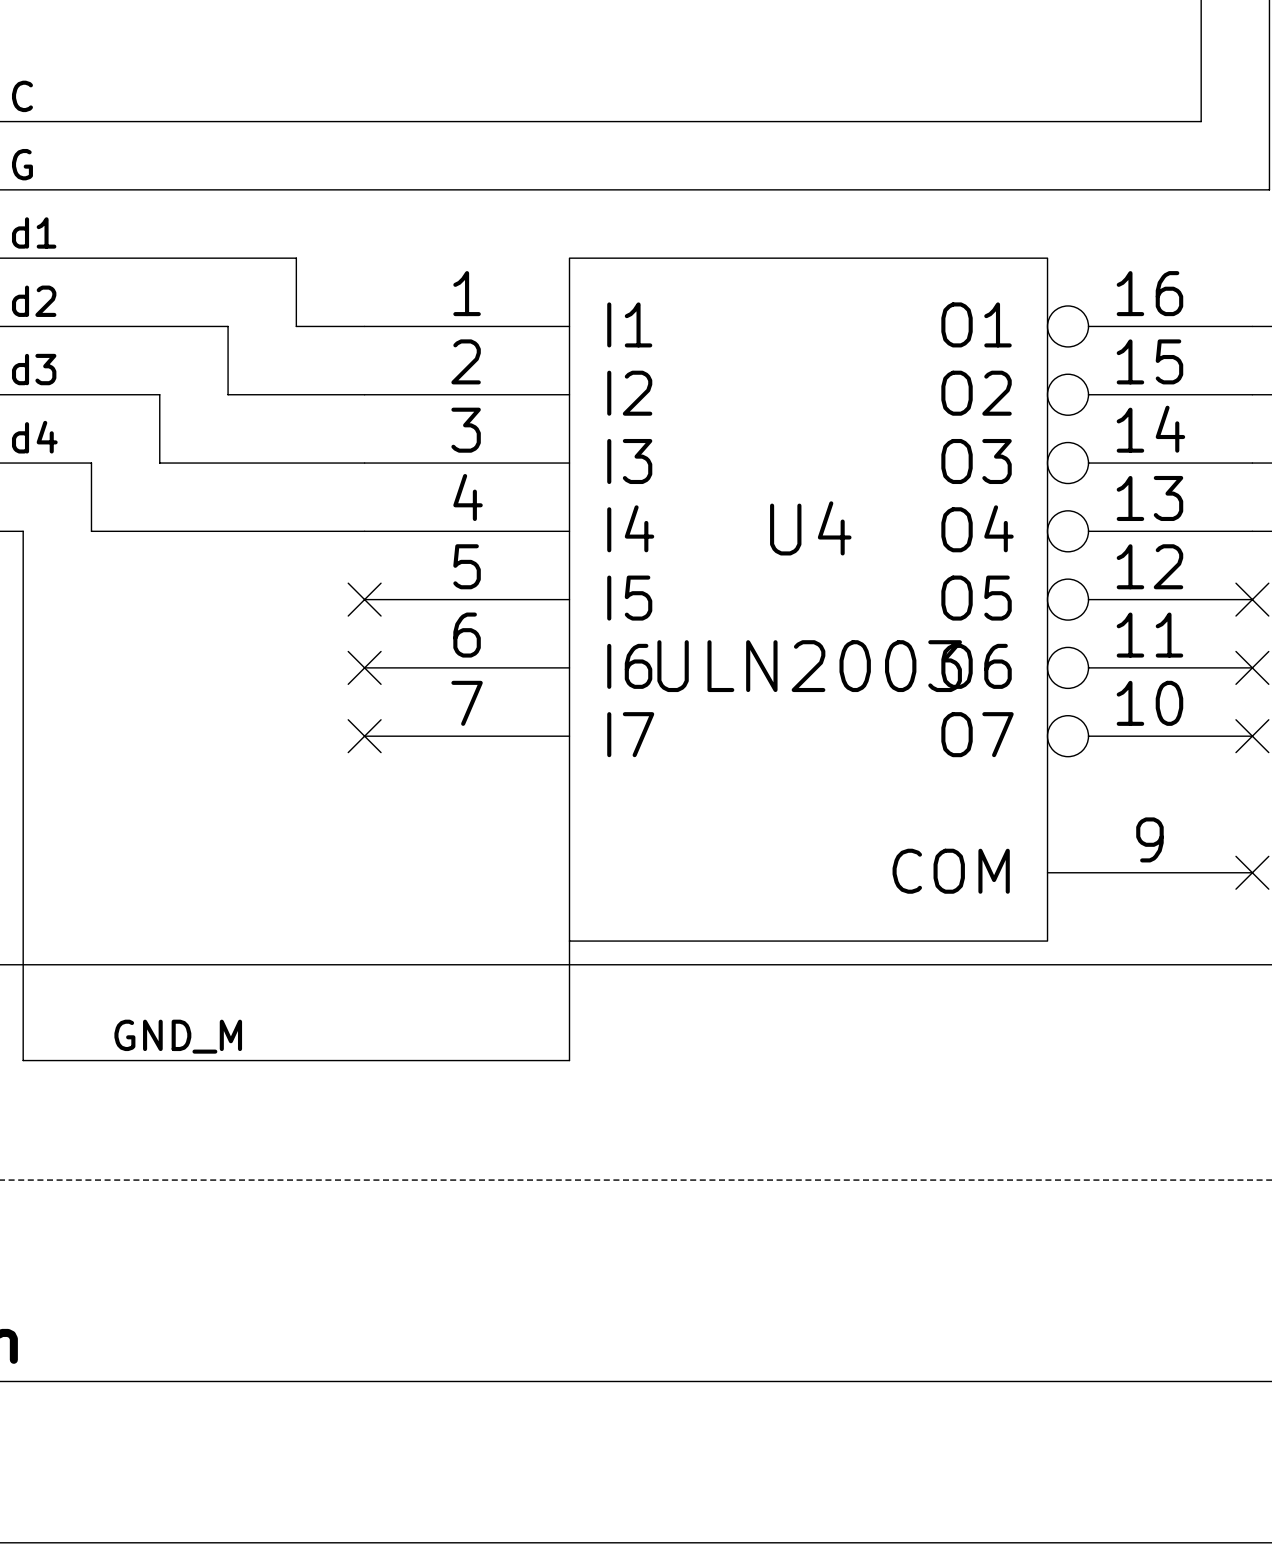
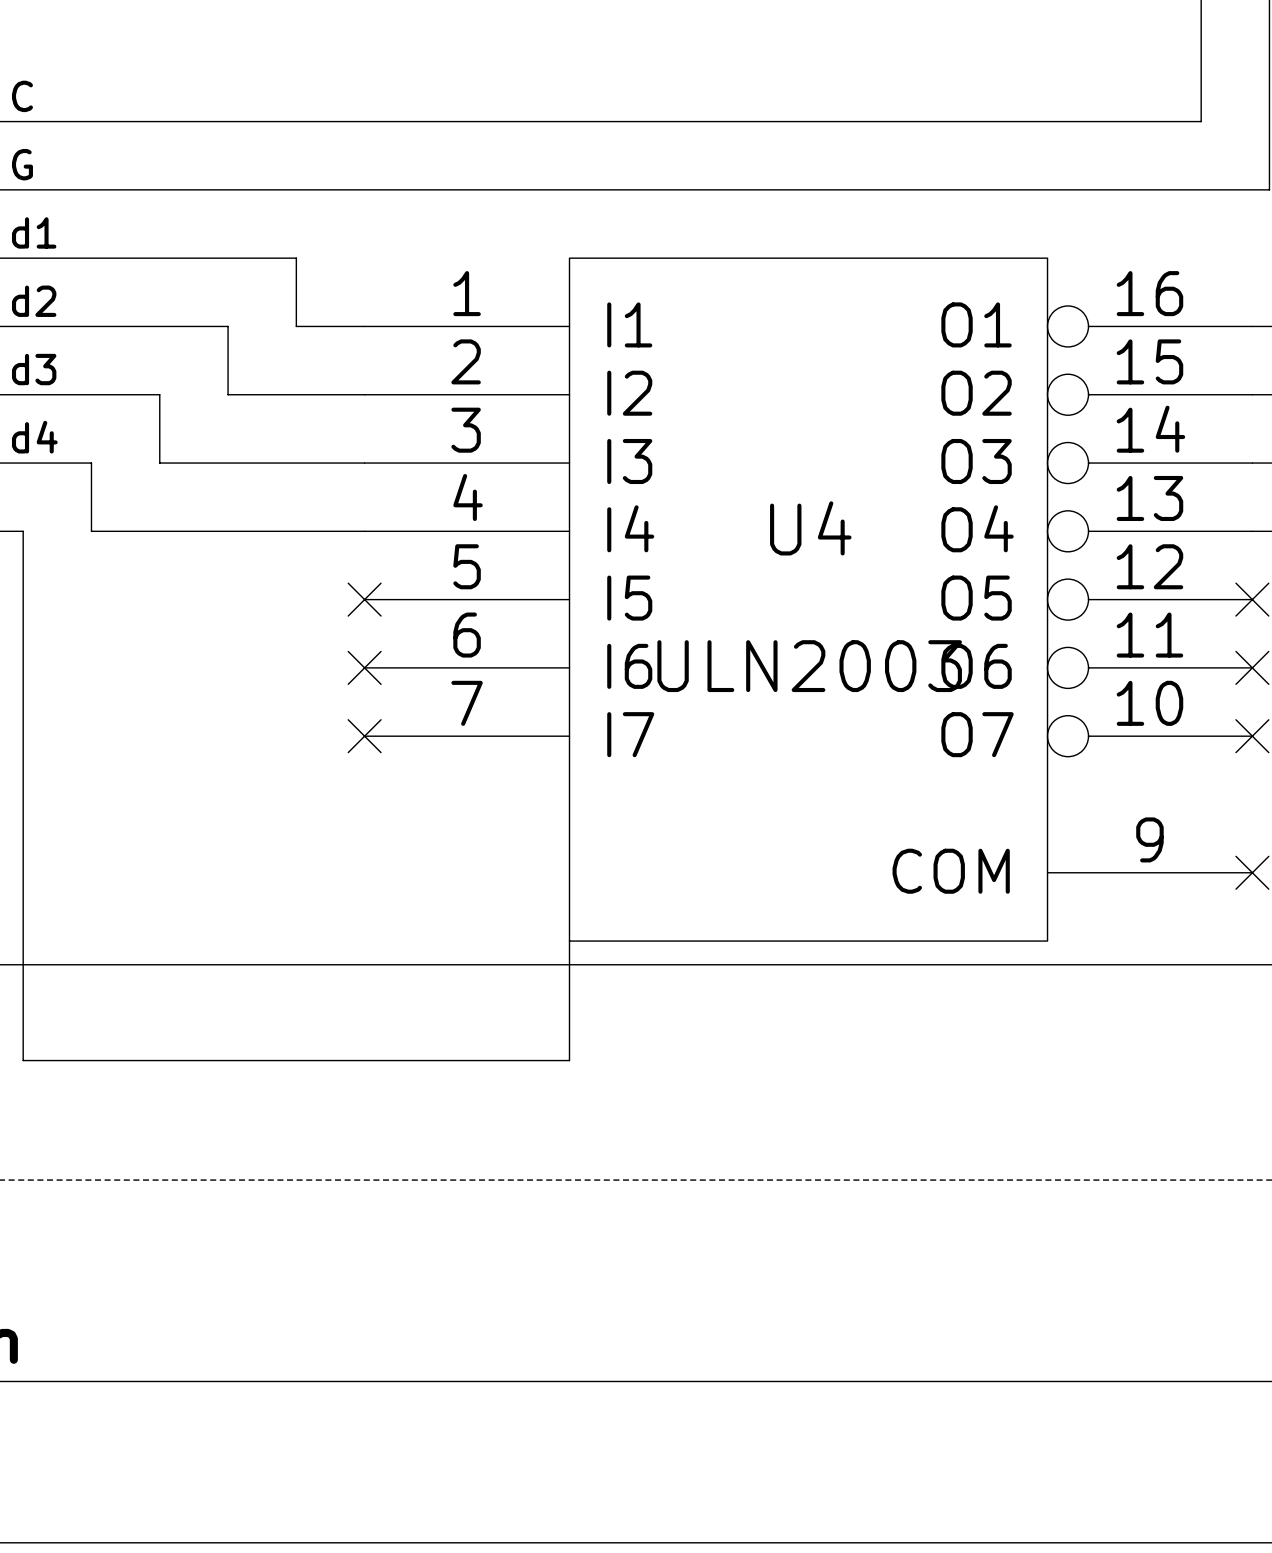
label: GND_M (178, 1036) -> none

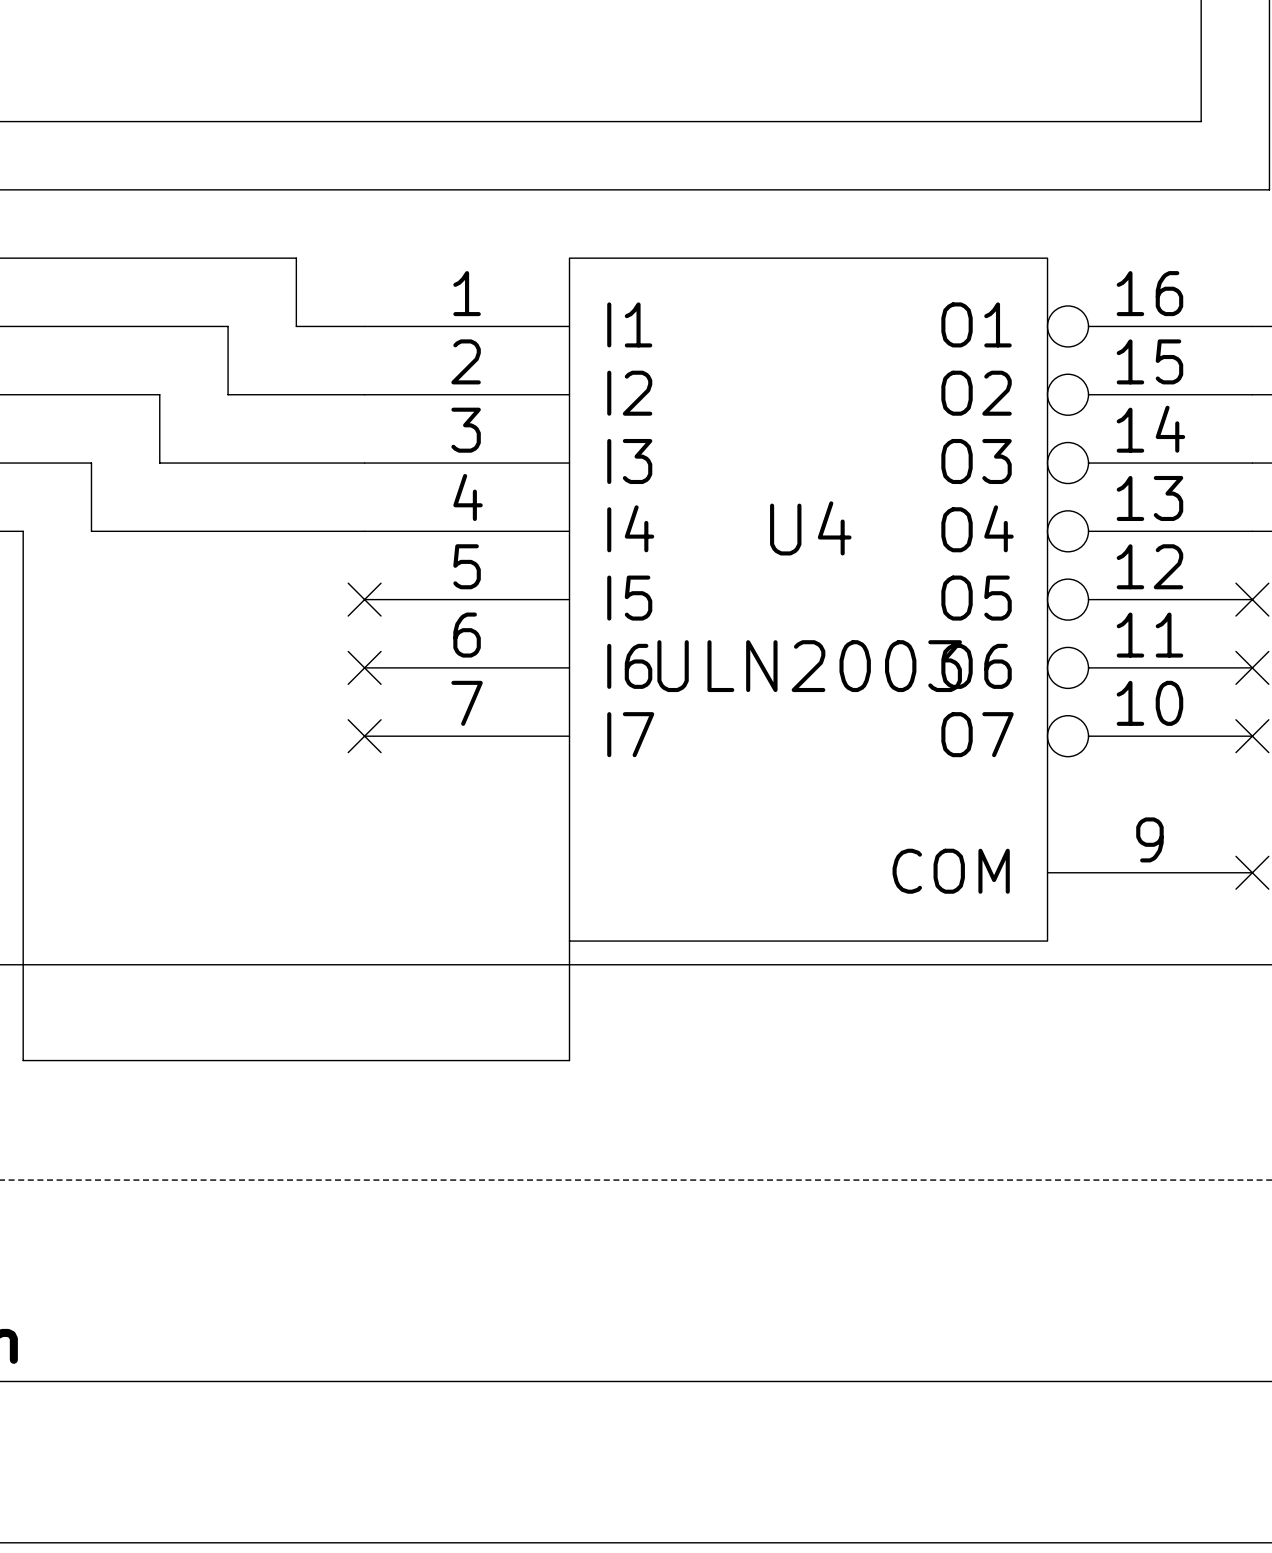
label: C (22, 96) -> none
label: G (22, 164) -> none
label: d1 (34, 232) -> none
label: d2 (34, 301) -> none
label: d3 (34, 369) -> none
label: d4 (34, 437) -> none

